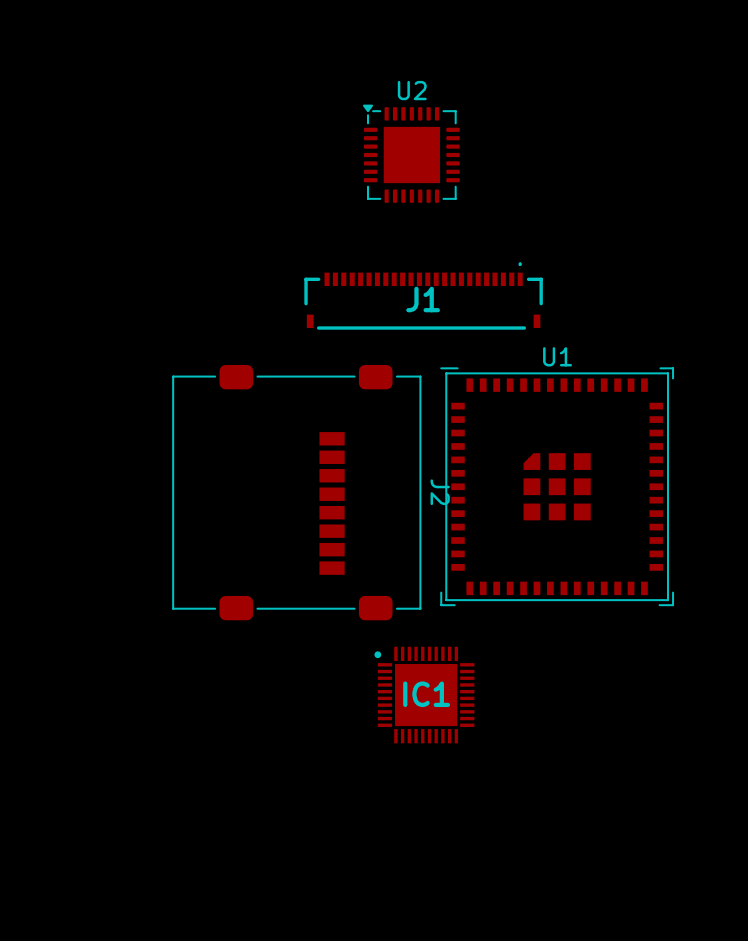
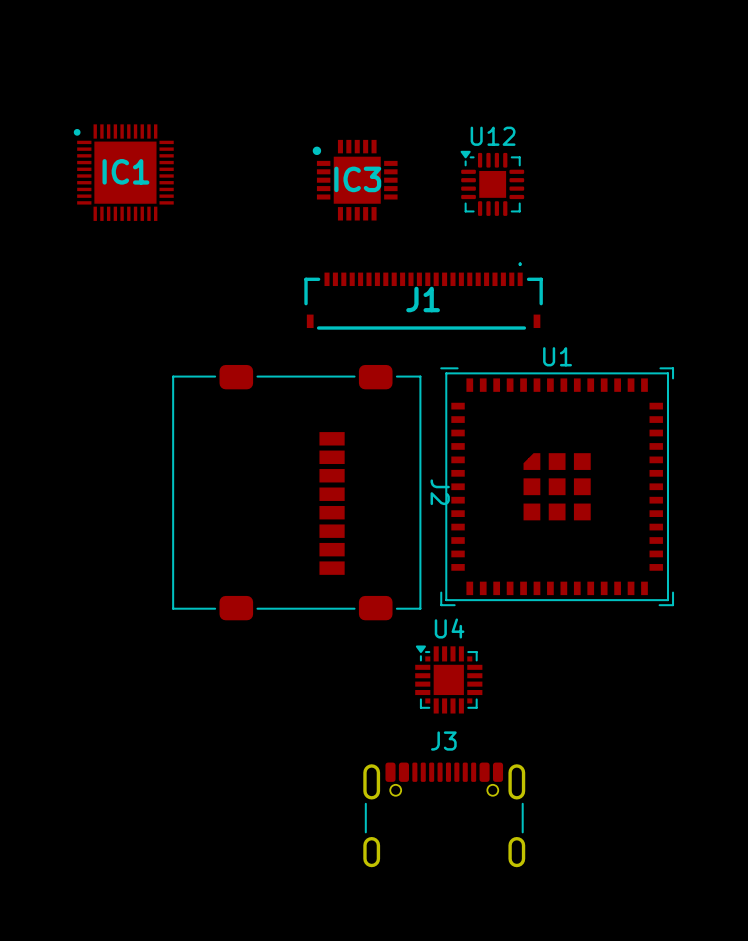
U2: (411, 153) -> none
IC3: none -> (355, 180)
U12: none -> (492, 183)
U4: none -> (448, 679)
IC1 position: (424, 695) -> (123, 172)
J3: none -> (444, 814)

